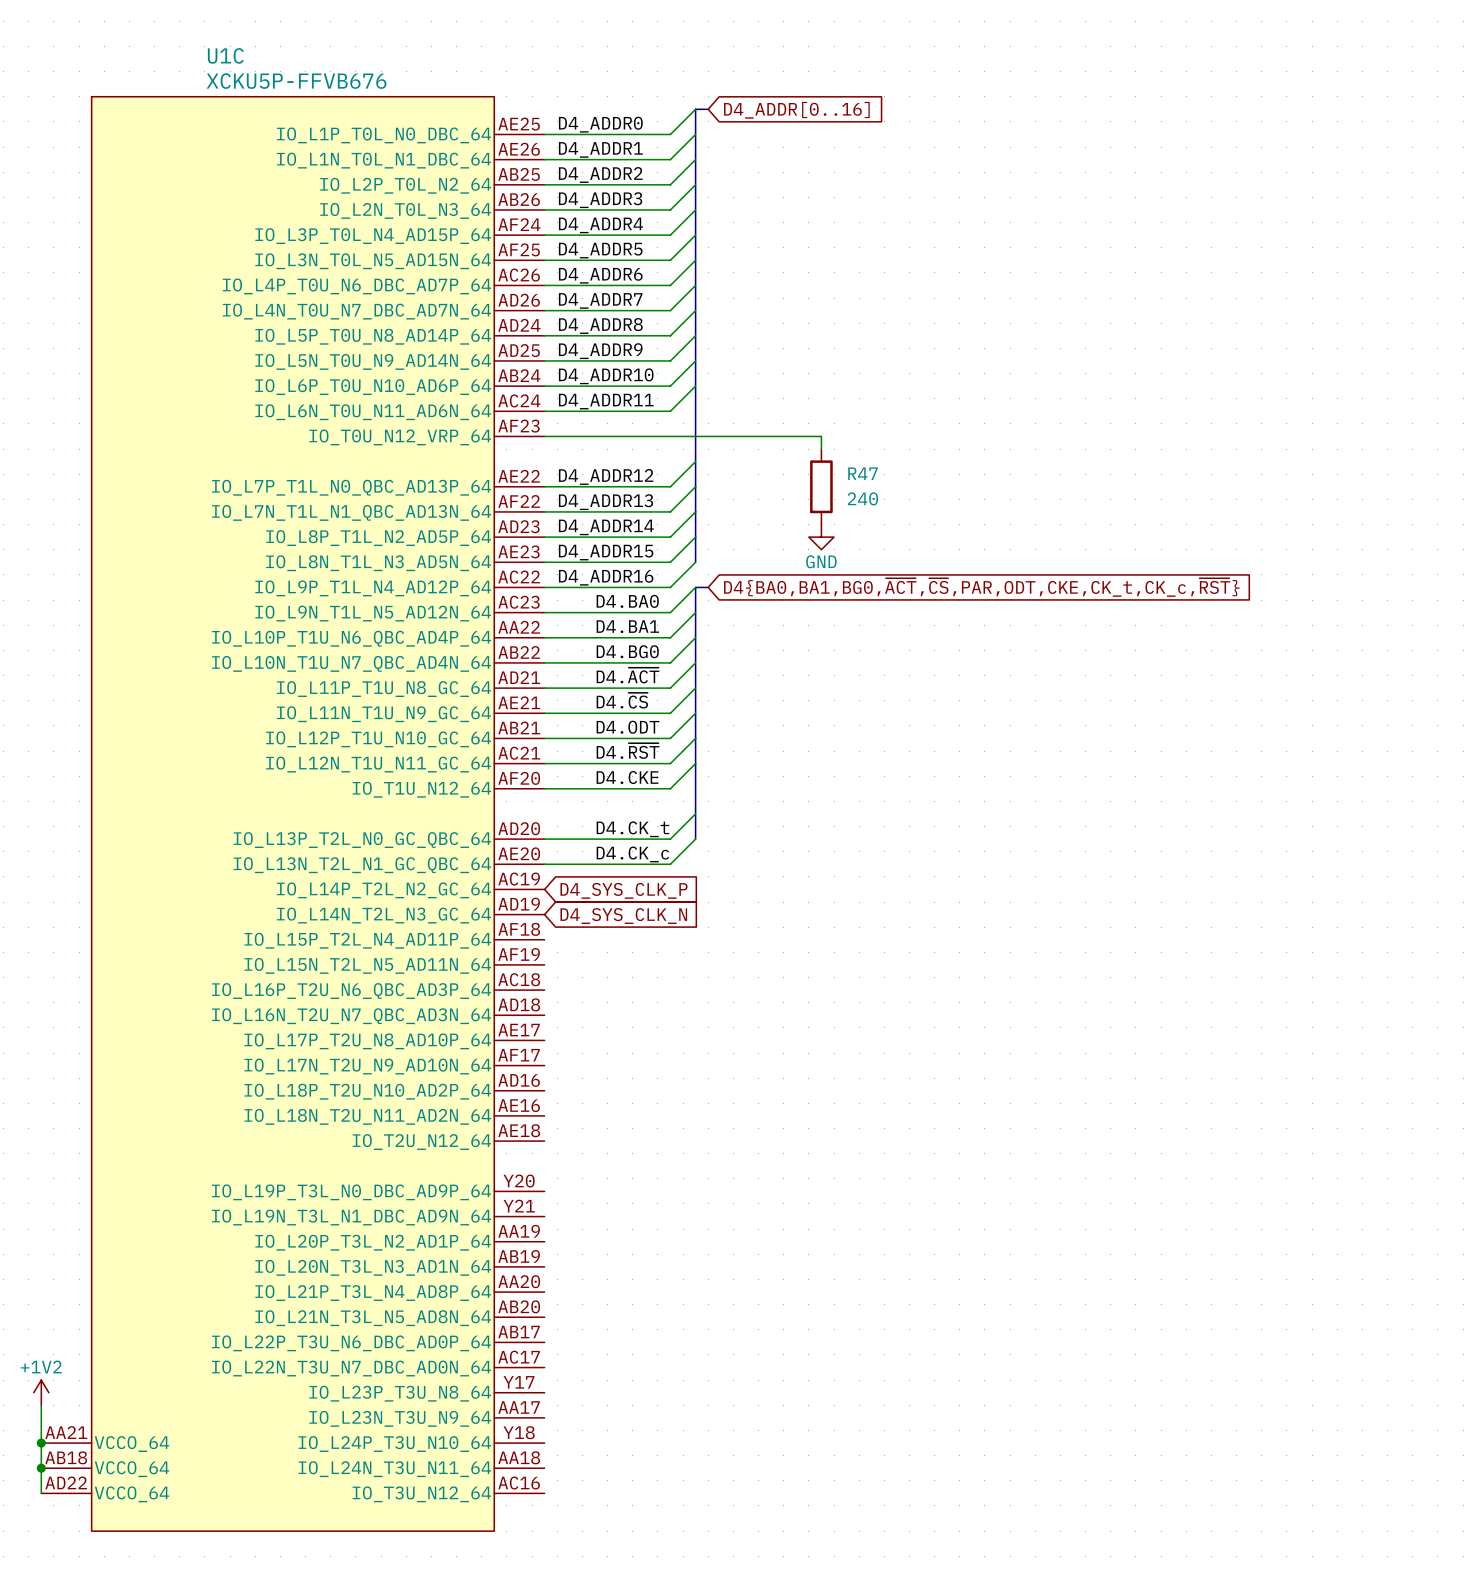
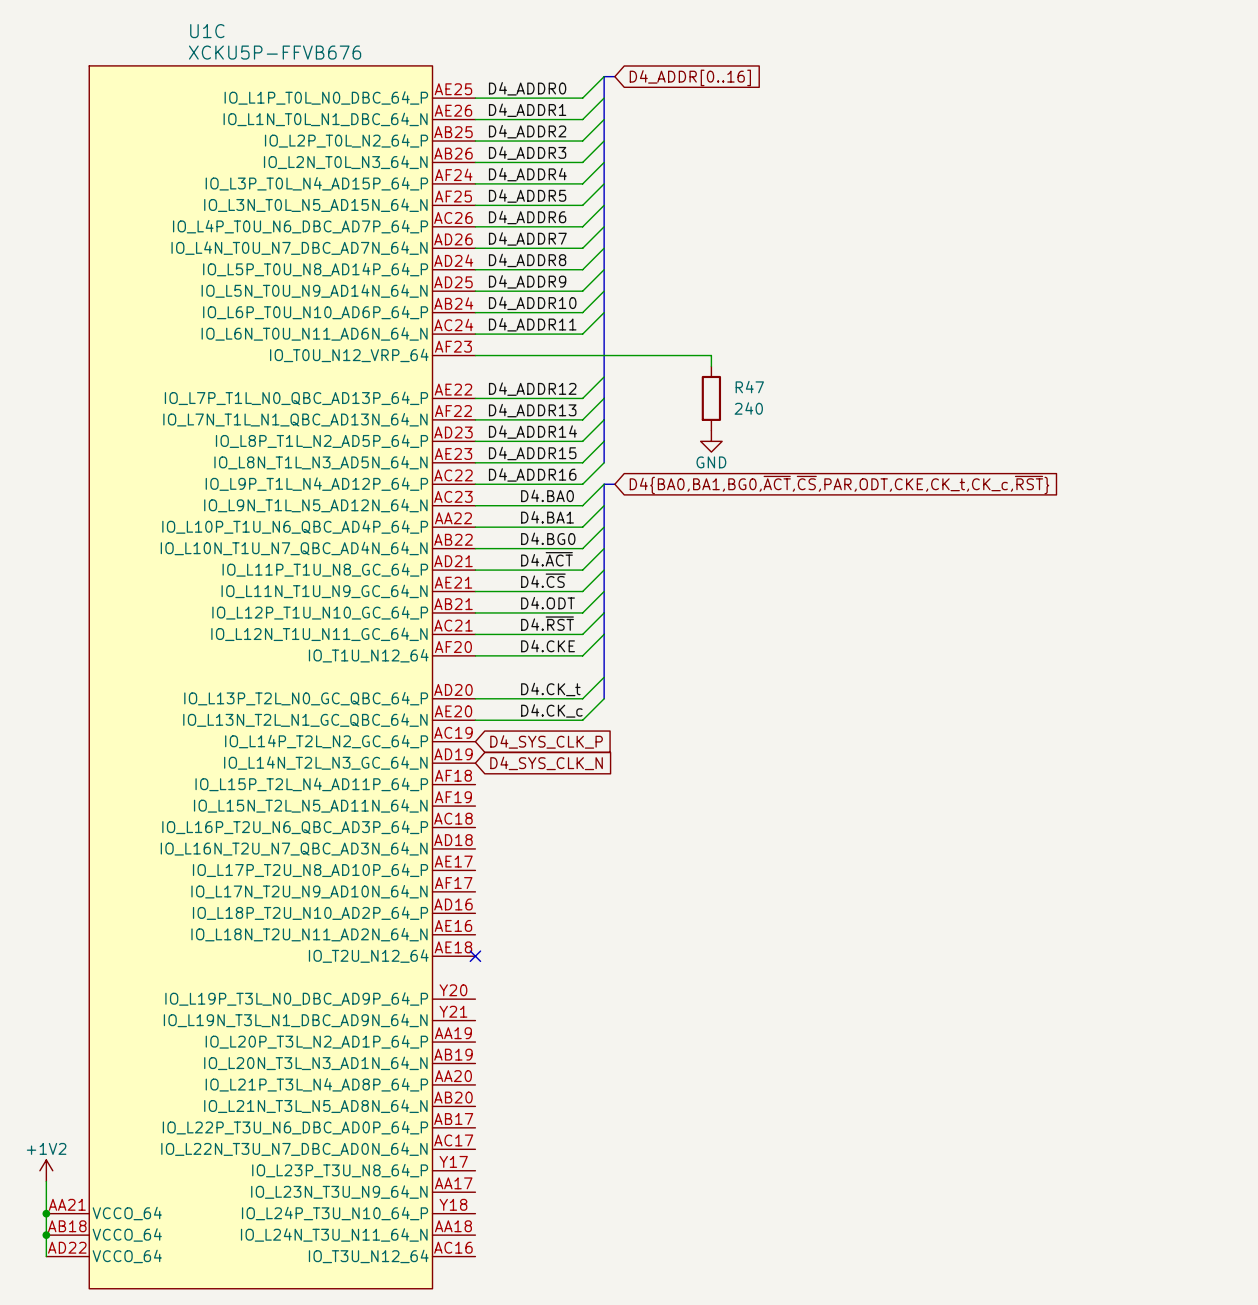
U1C symbol: [41, 96, 545, 1532] -> [46, 65, 476, 1289]
no-connect mark: none -> (475, 956)

